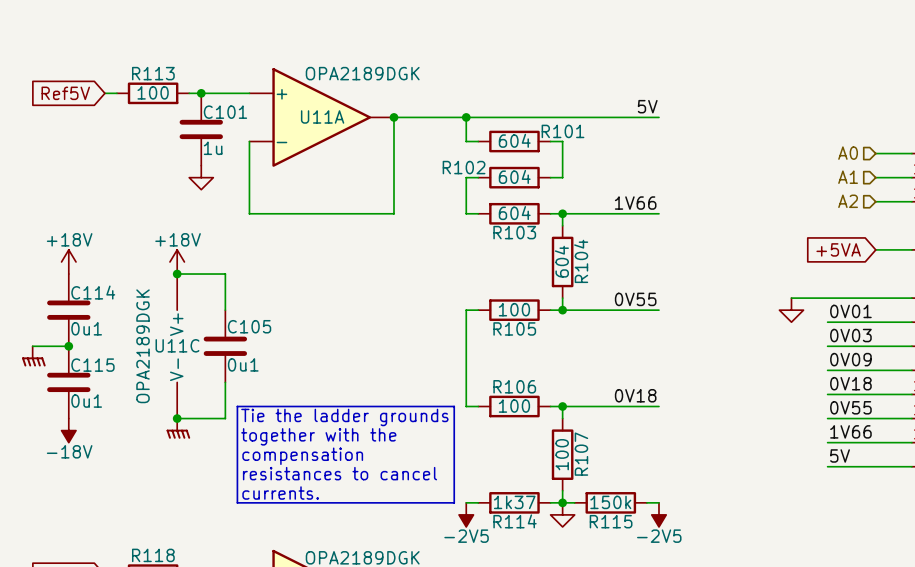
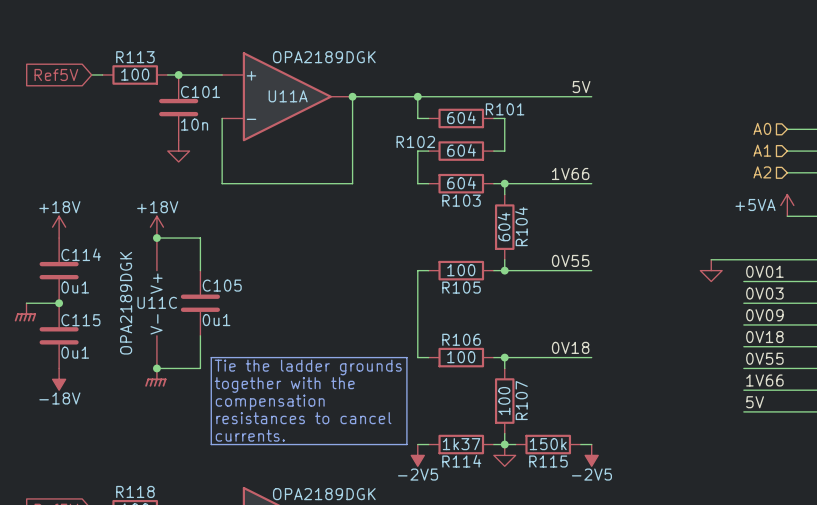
C101 value: 1u (213, 148) -> 10n (194, 124)
power symbol: none -> +5VA (787, 205)
global label: +5VA (838, 249) -> none
power symbol flip: as is (33, 356) -> left-right (25, 312)
power symbol flip: as is (178, 428) -> left-right (155, 377)

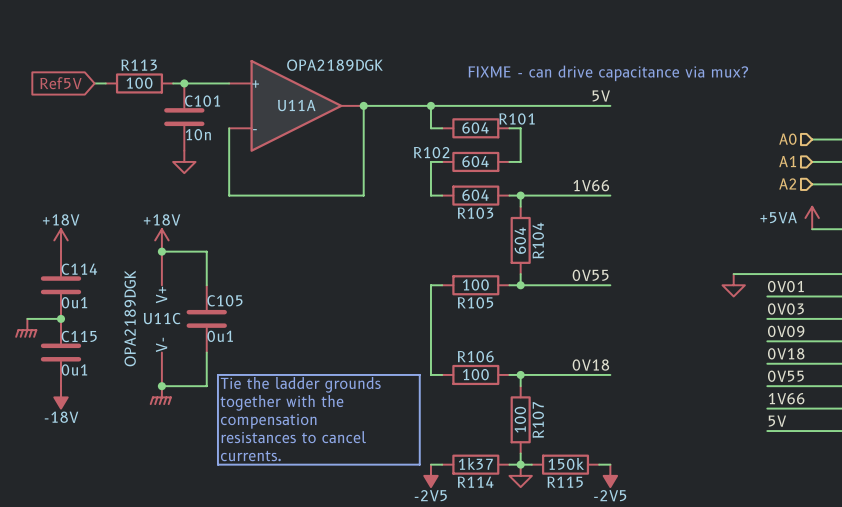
text: none -> FIXME - can drive capacitance via mux? (608, 73)

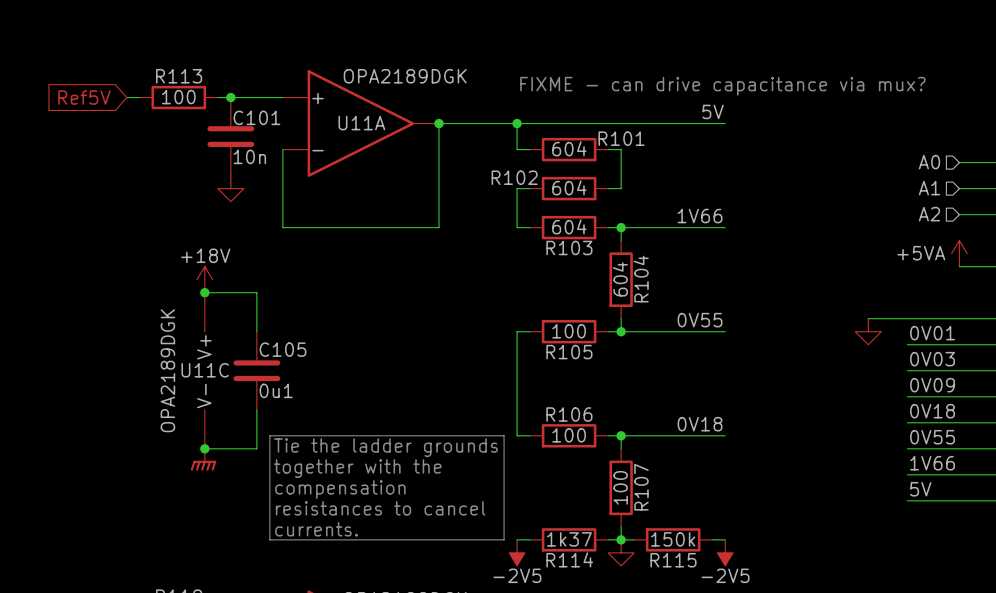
power symbol: +18V (61, 240) -> none
C114: 0u1 (61, 285) -> none
wire: (27, 318) (61, 318) -> none
junction: (61, 318) -> none
power symbol: (26, 328) -> none
C115: 0u1 (61, 352) -> none
power symbol: -18V (61, 397) -> none

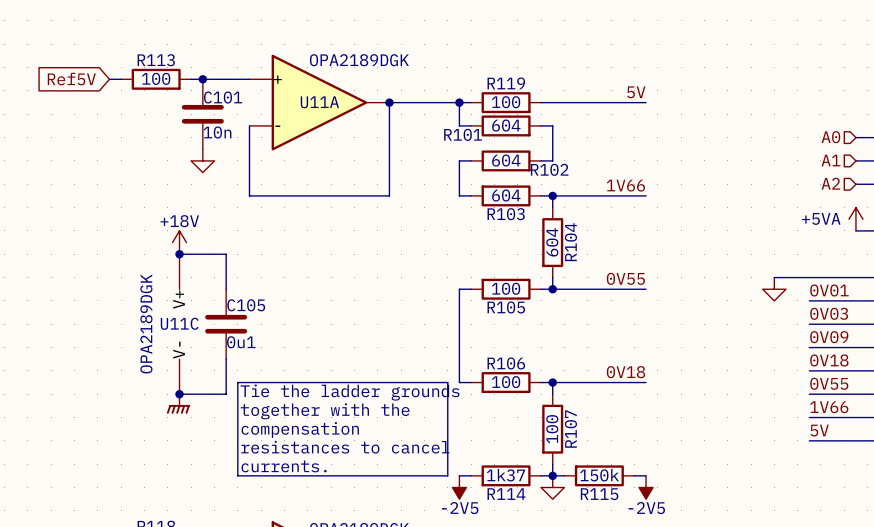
text: FIXME - can drive capacitance via mux? (722, 86) -> none
wire: (530, 123) (608, 123) -> none
R119: none -> 100 (506, 102)
R101 name position: R101 (621, 138) -> R101 (463, 134)
R102 name position: R102 (514, 177) -> R102 (549, 169)

